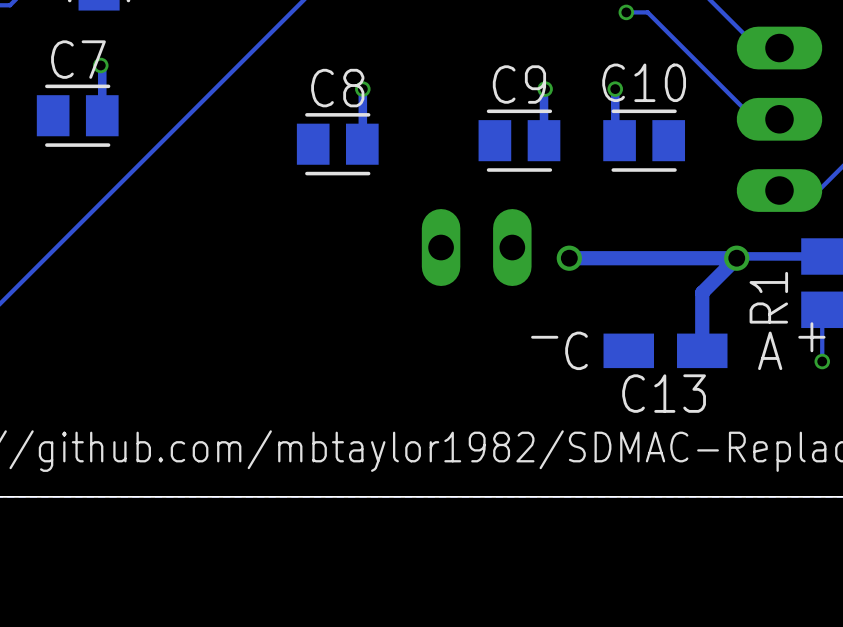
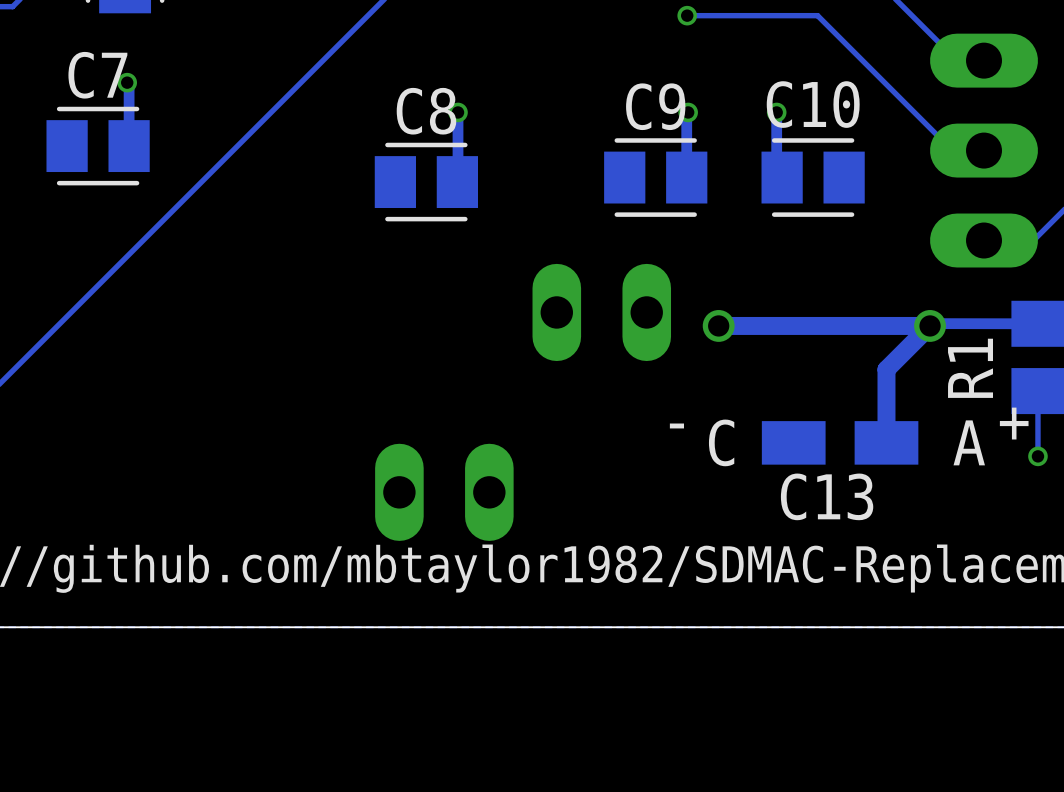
via: none -> (687, 15)
track: none -> (790, 15) (687, 15)
via: (626, 12) -> none
part: none -> (444, 492)

